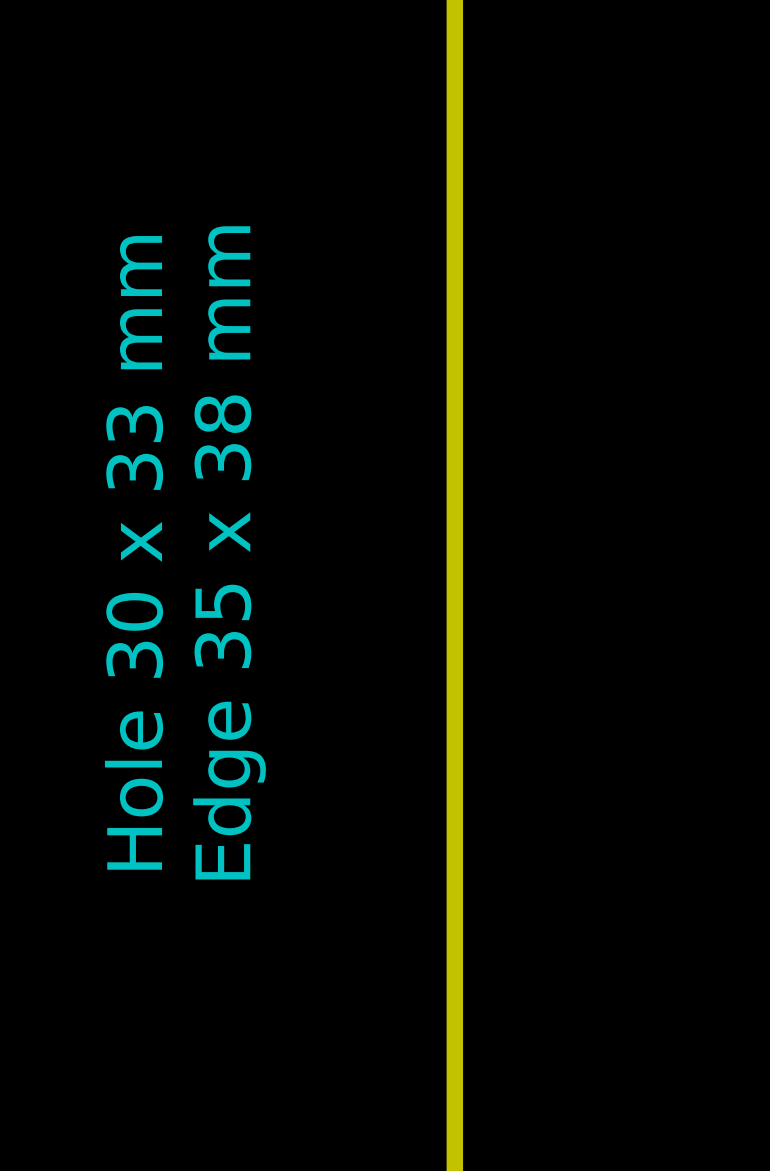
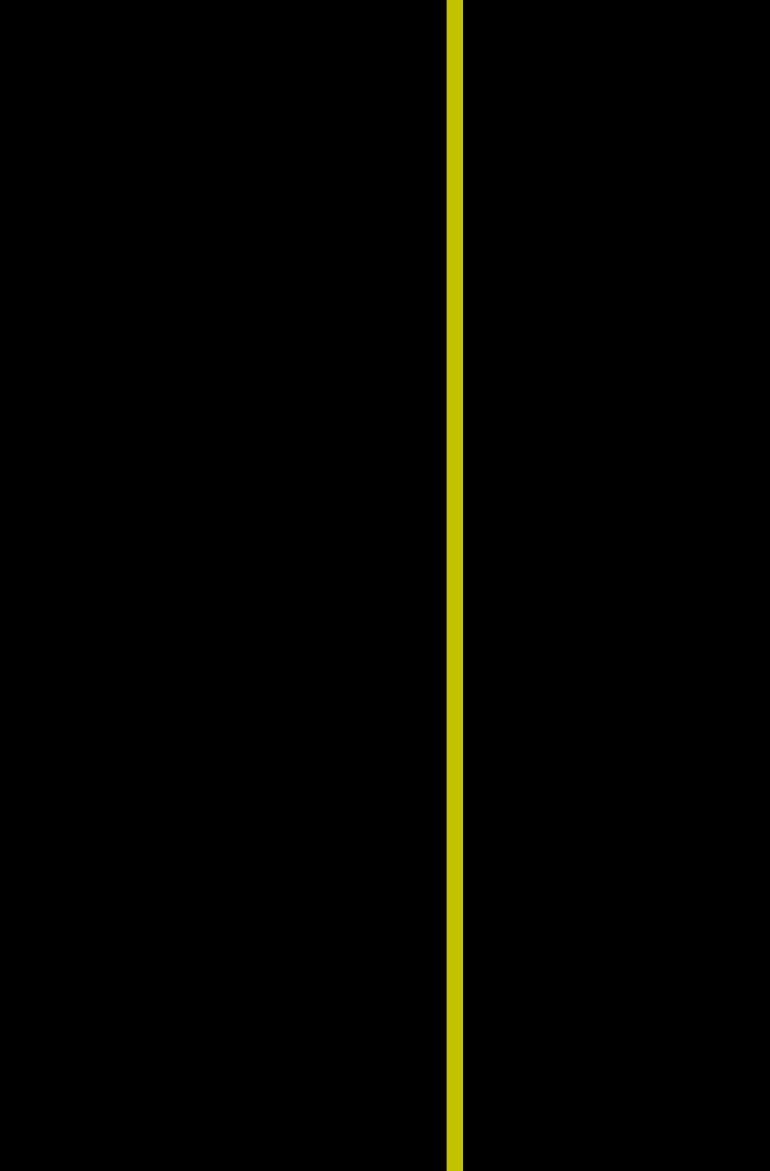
text: Hole 30 x 33 mm (134, 552) -> none
text: Edge 35 x 38 mm (229, 552) -> none

